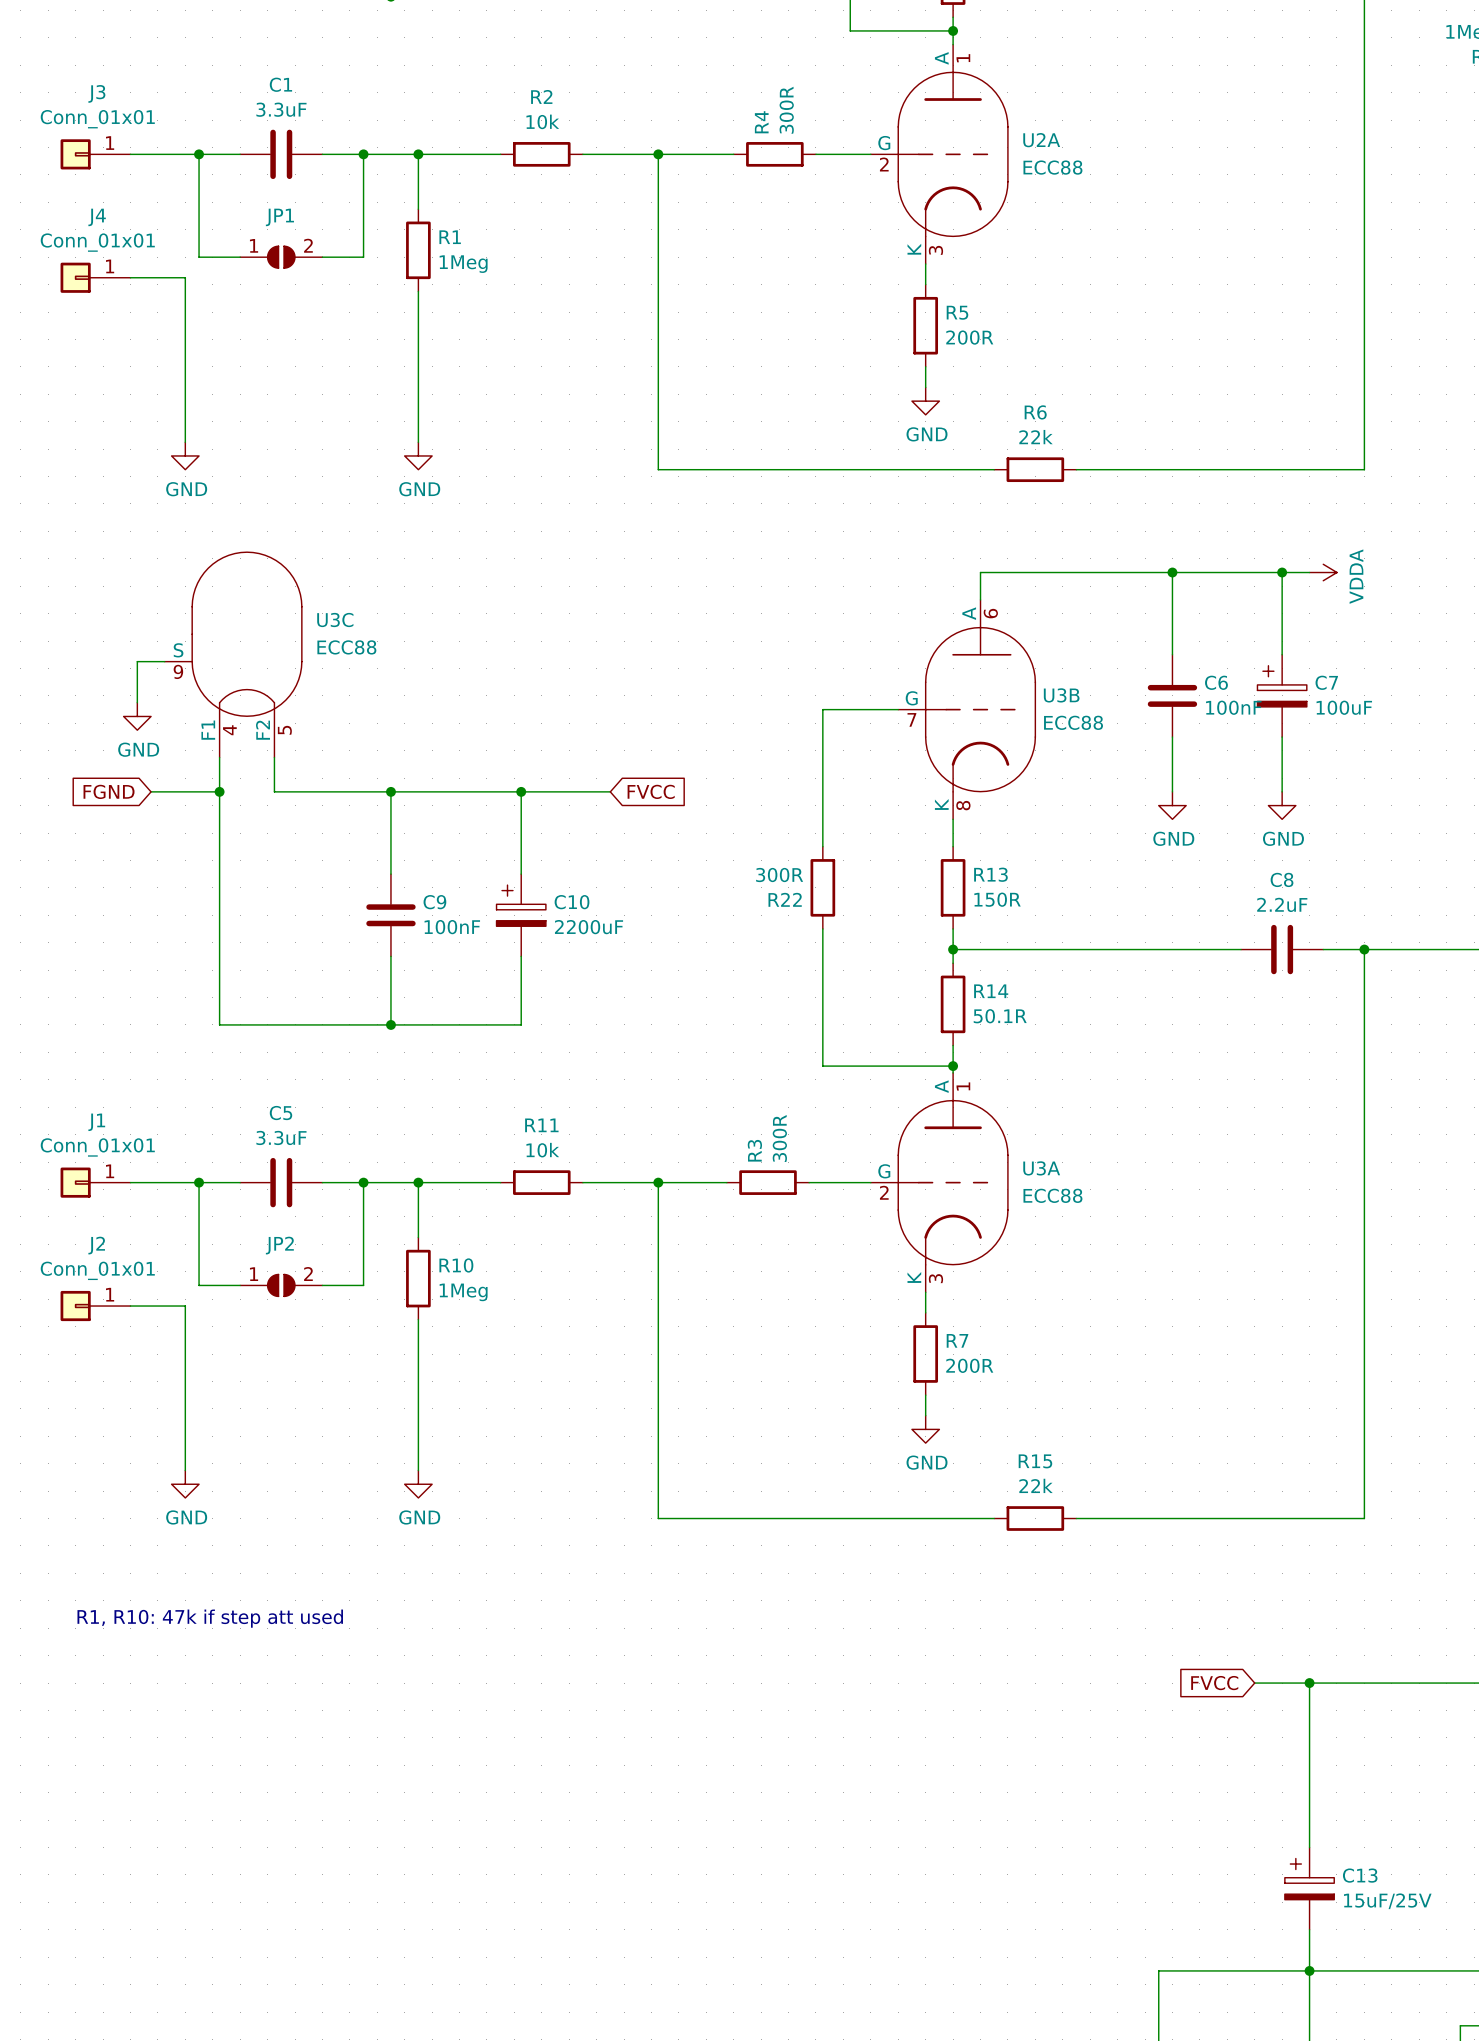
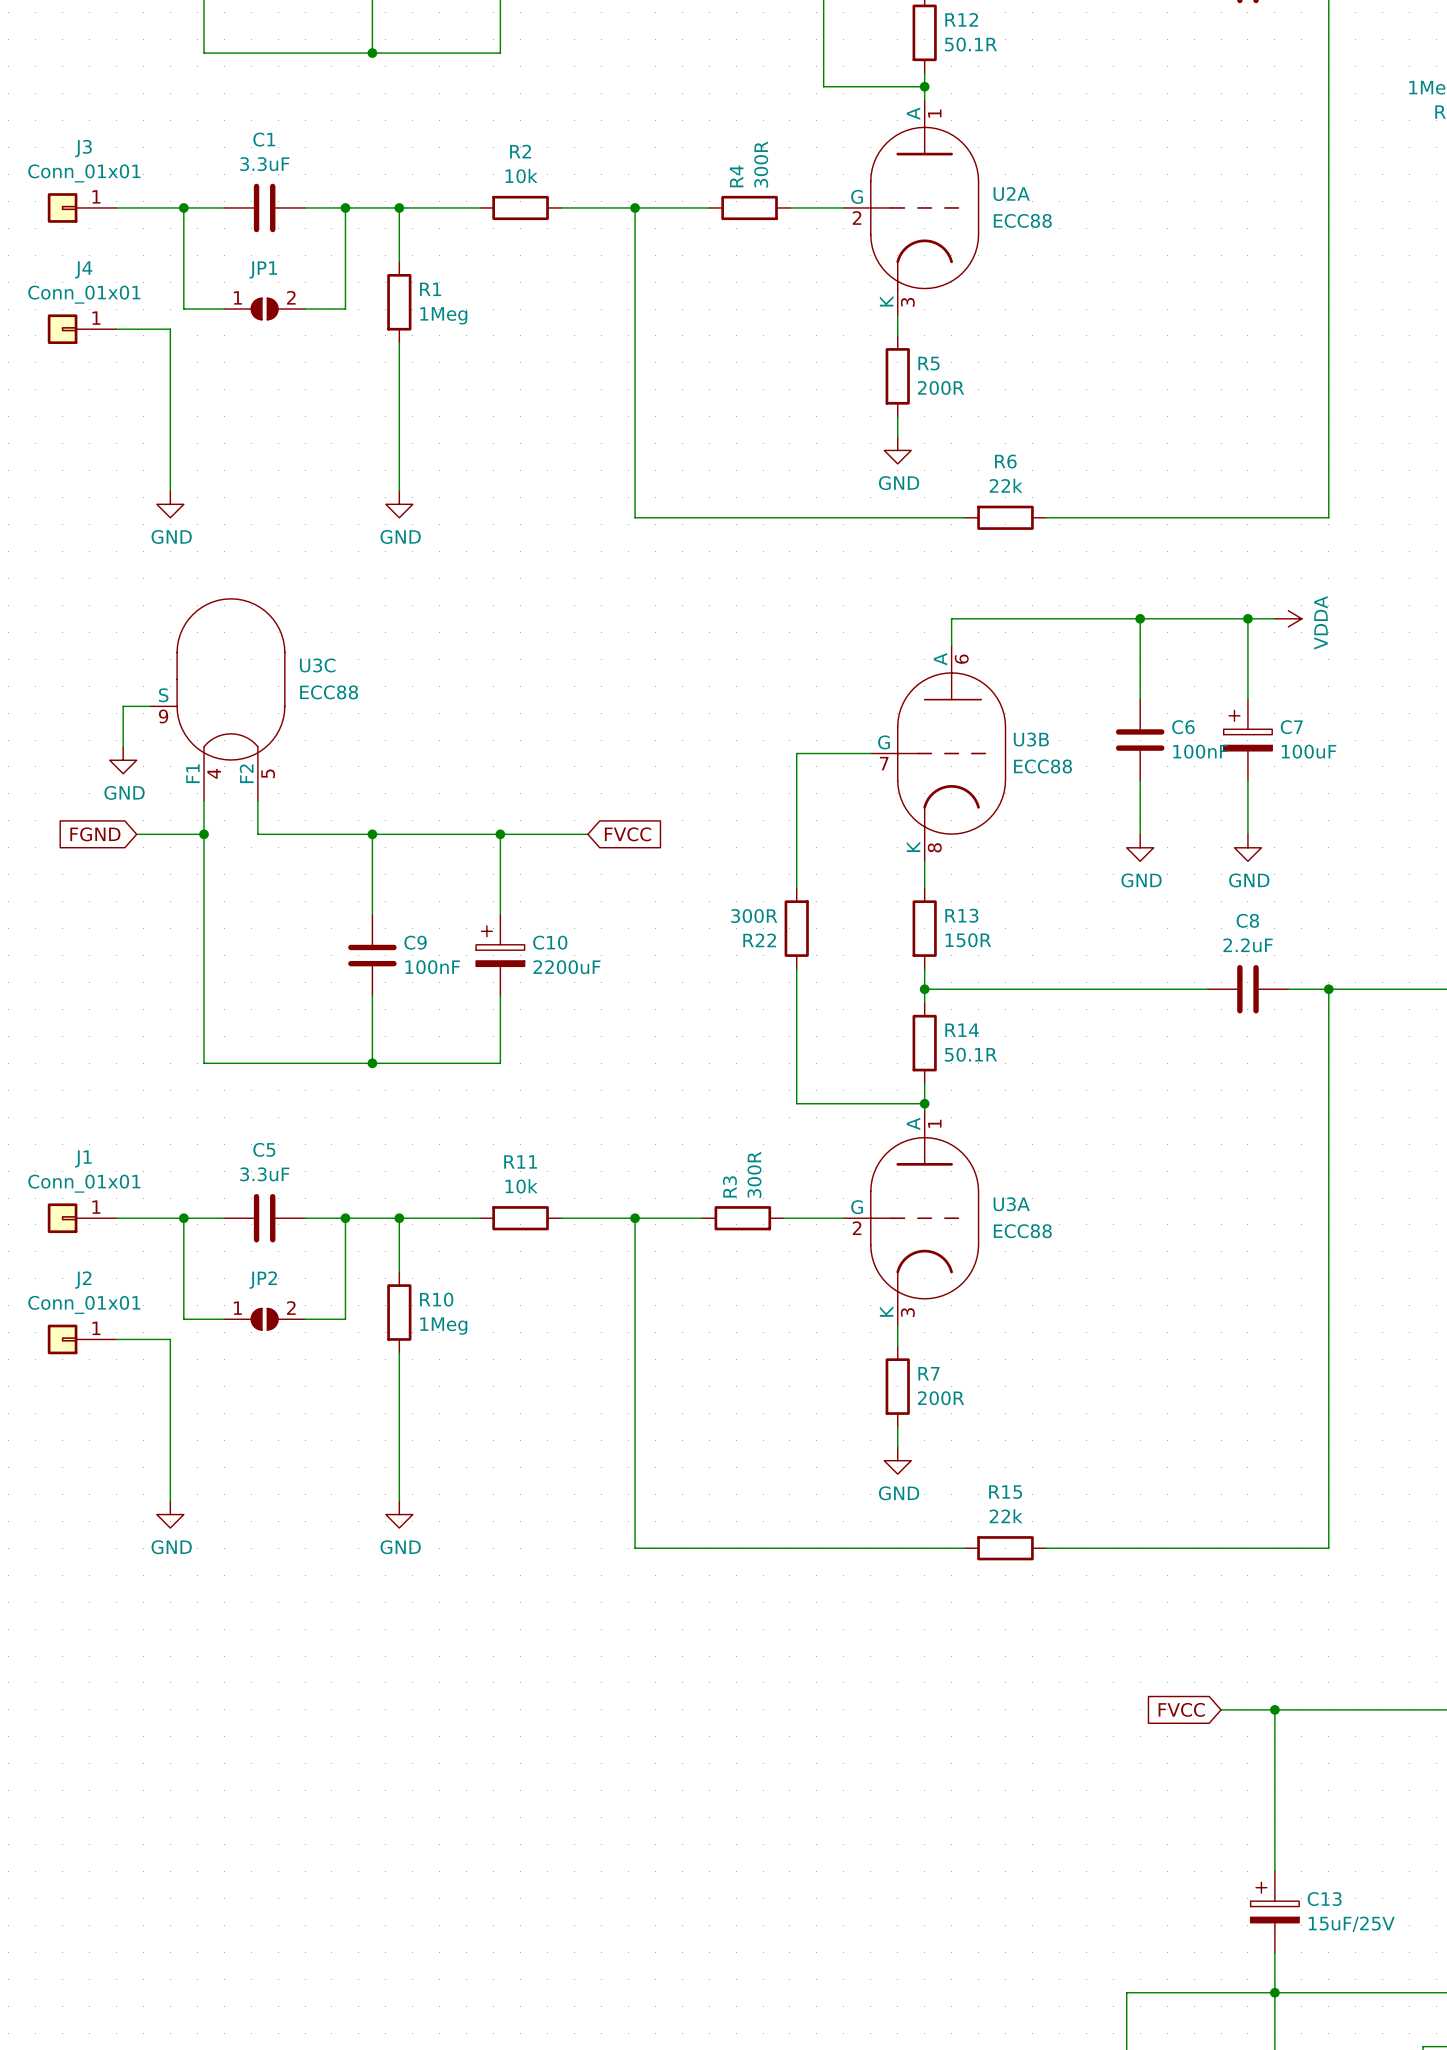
text: R1, R10: 47k if step att used (210, 1618) -> none

